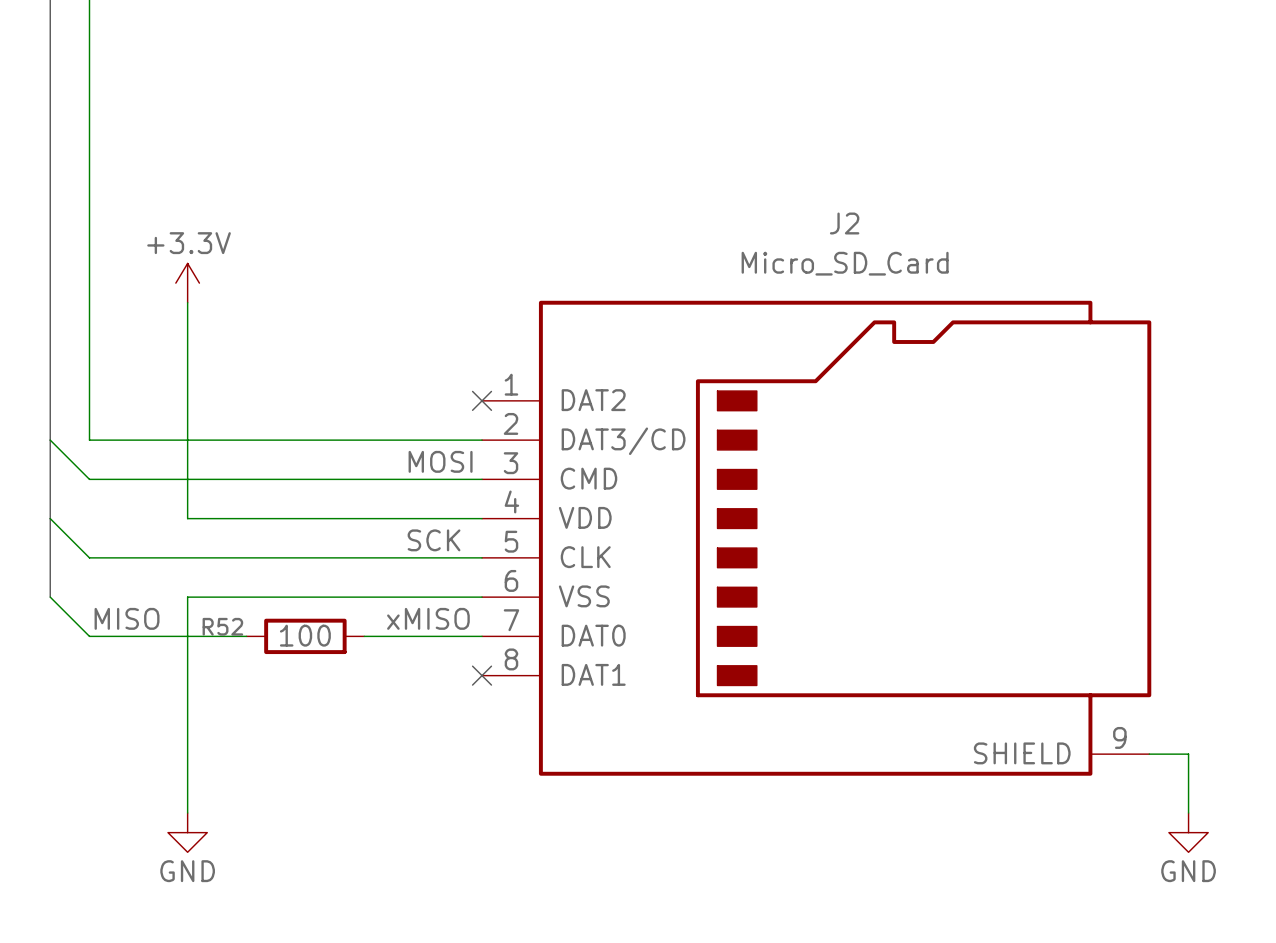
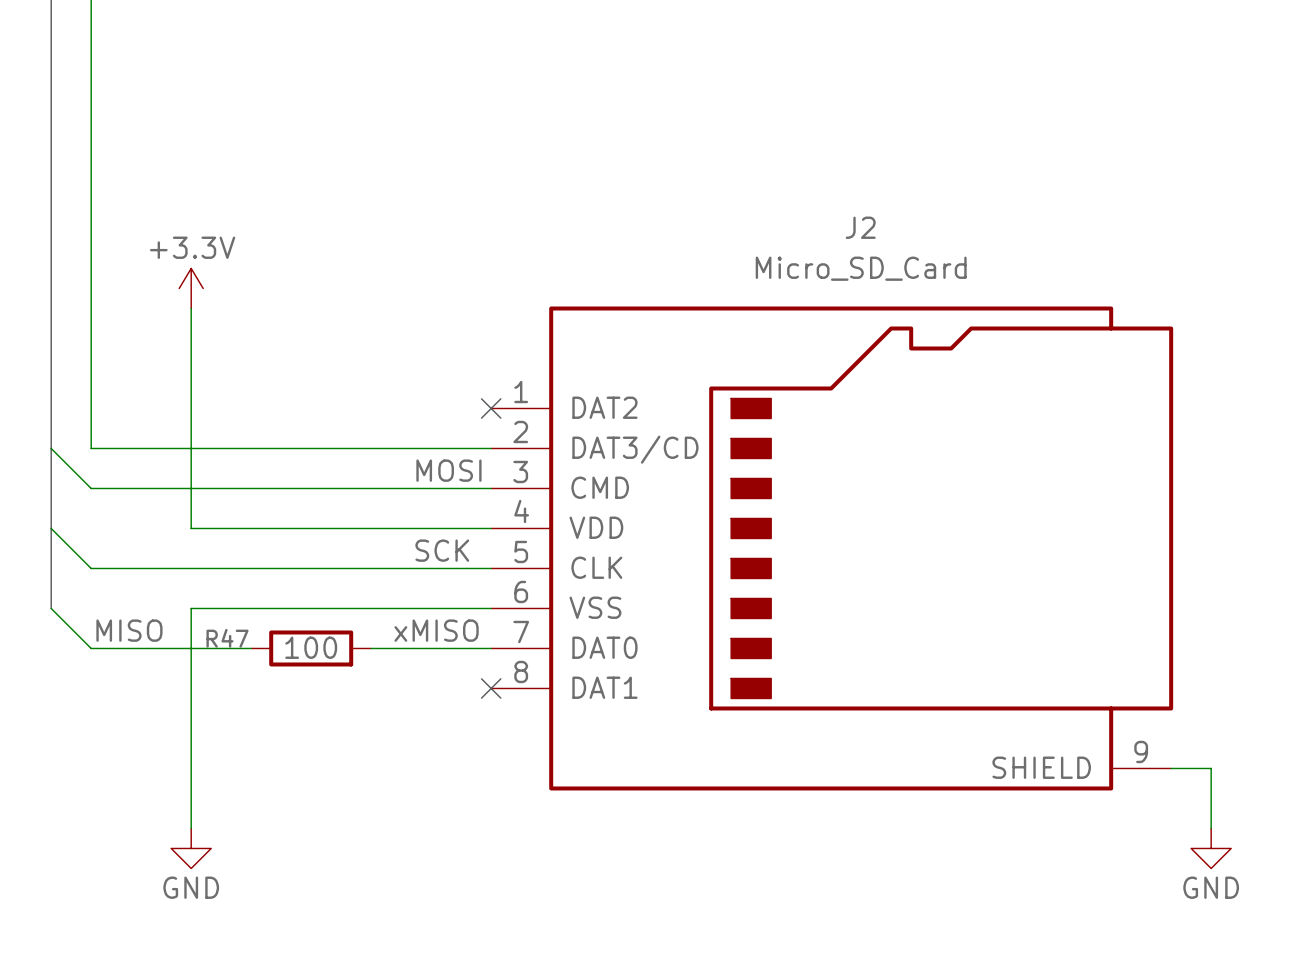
R52 name: R52 (222, 626) -> R47 (227, 638)

